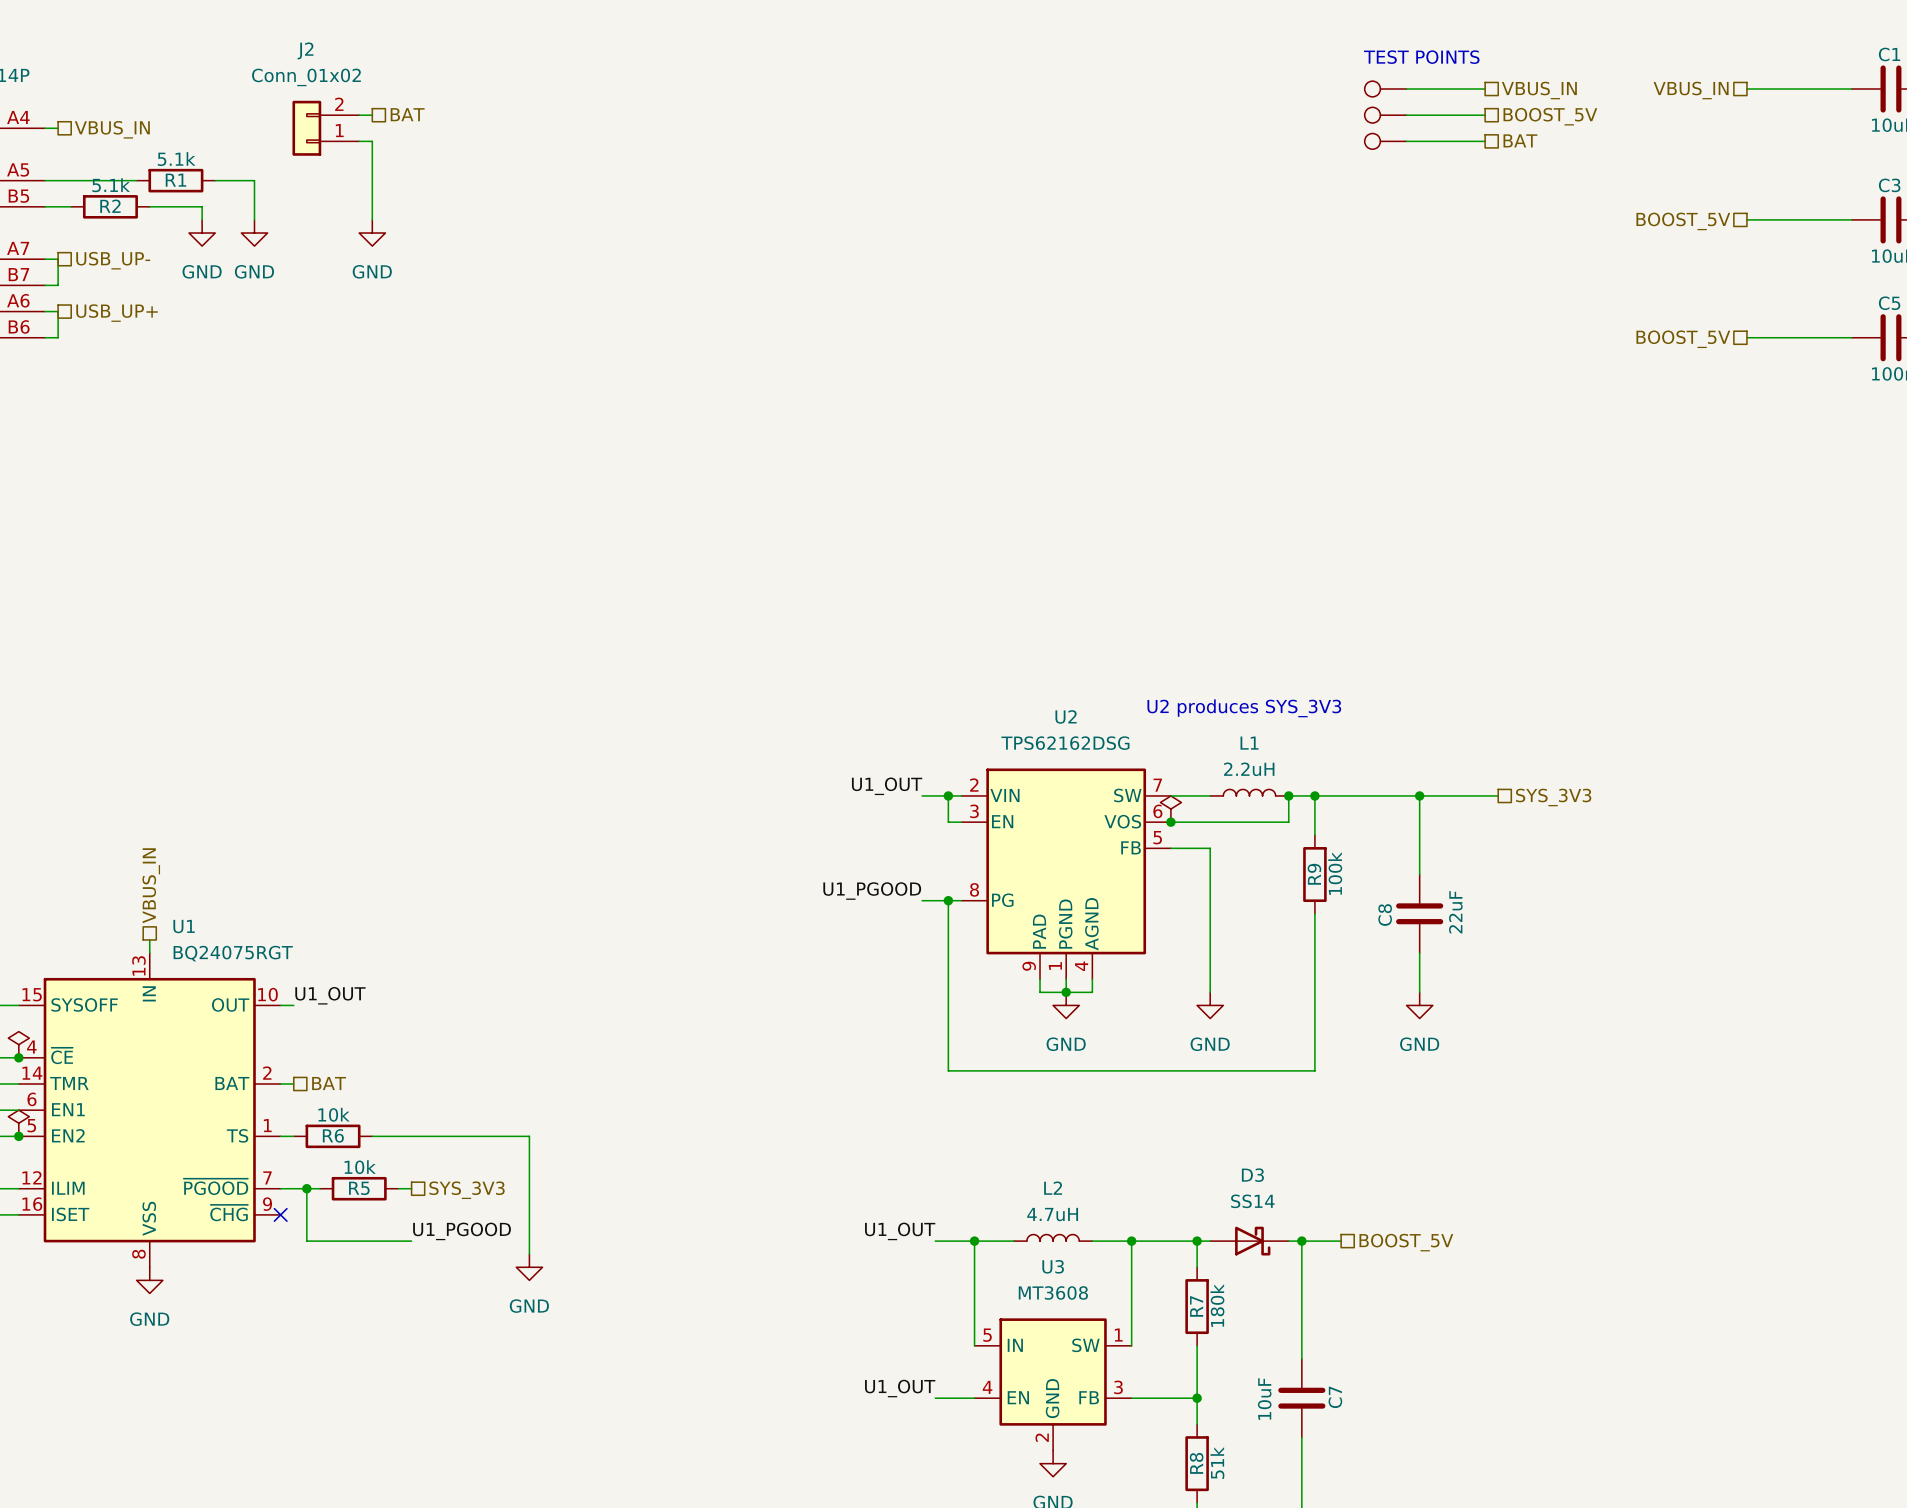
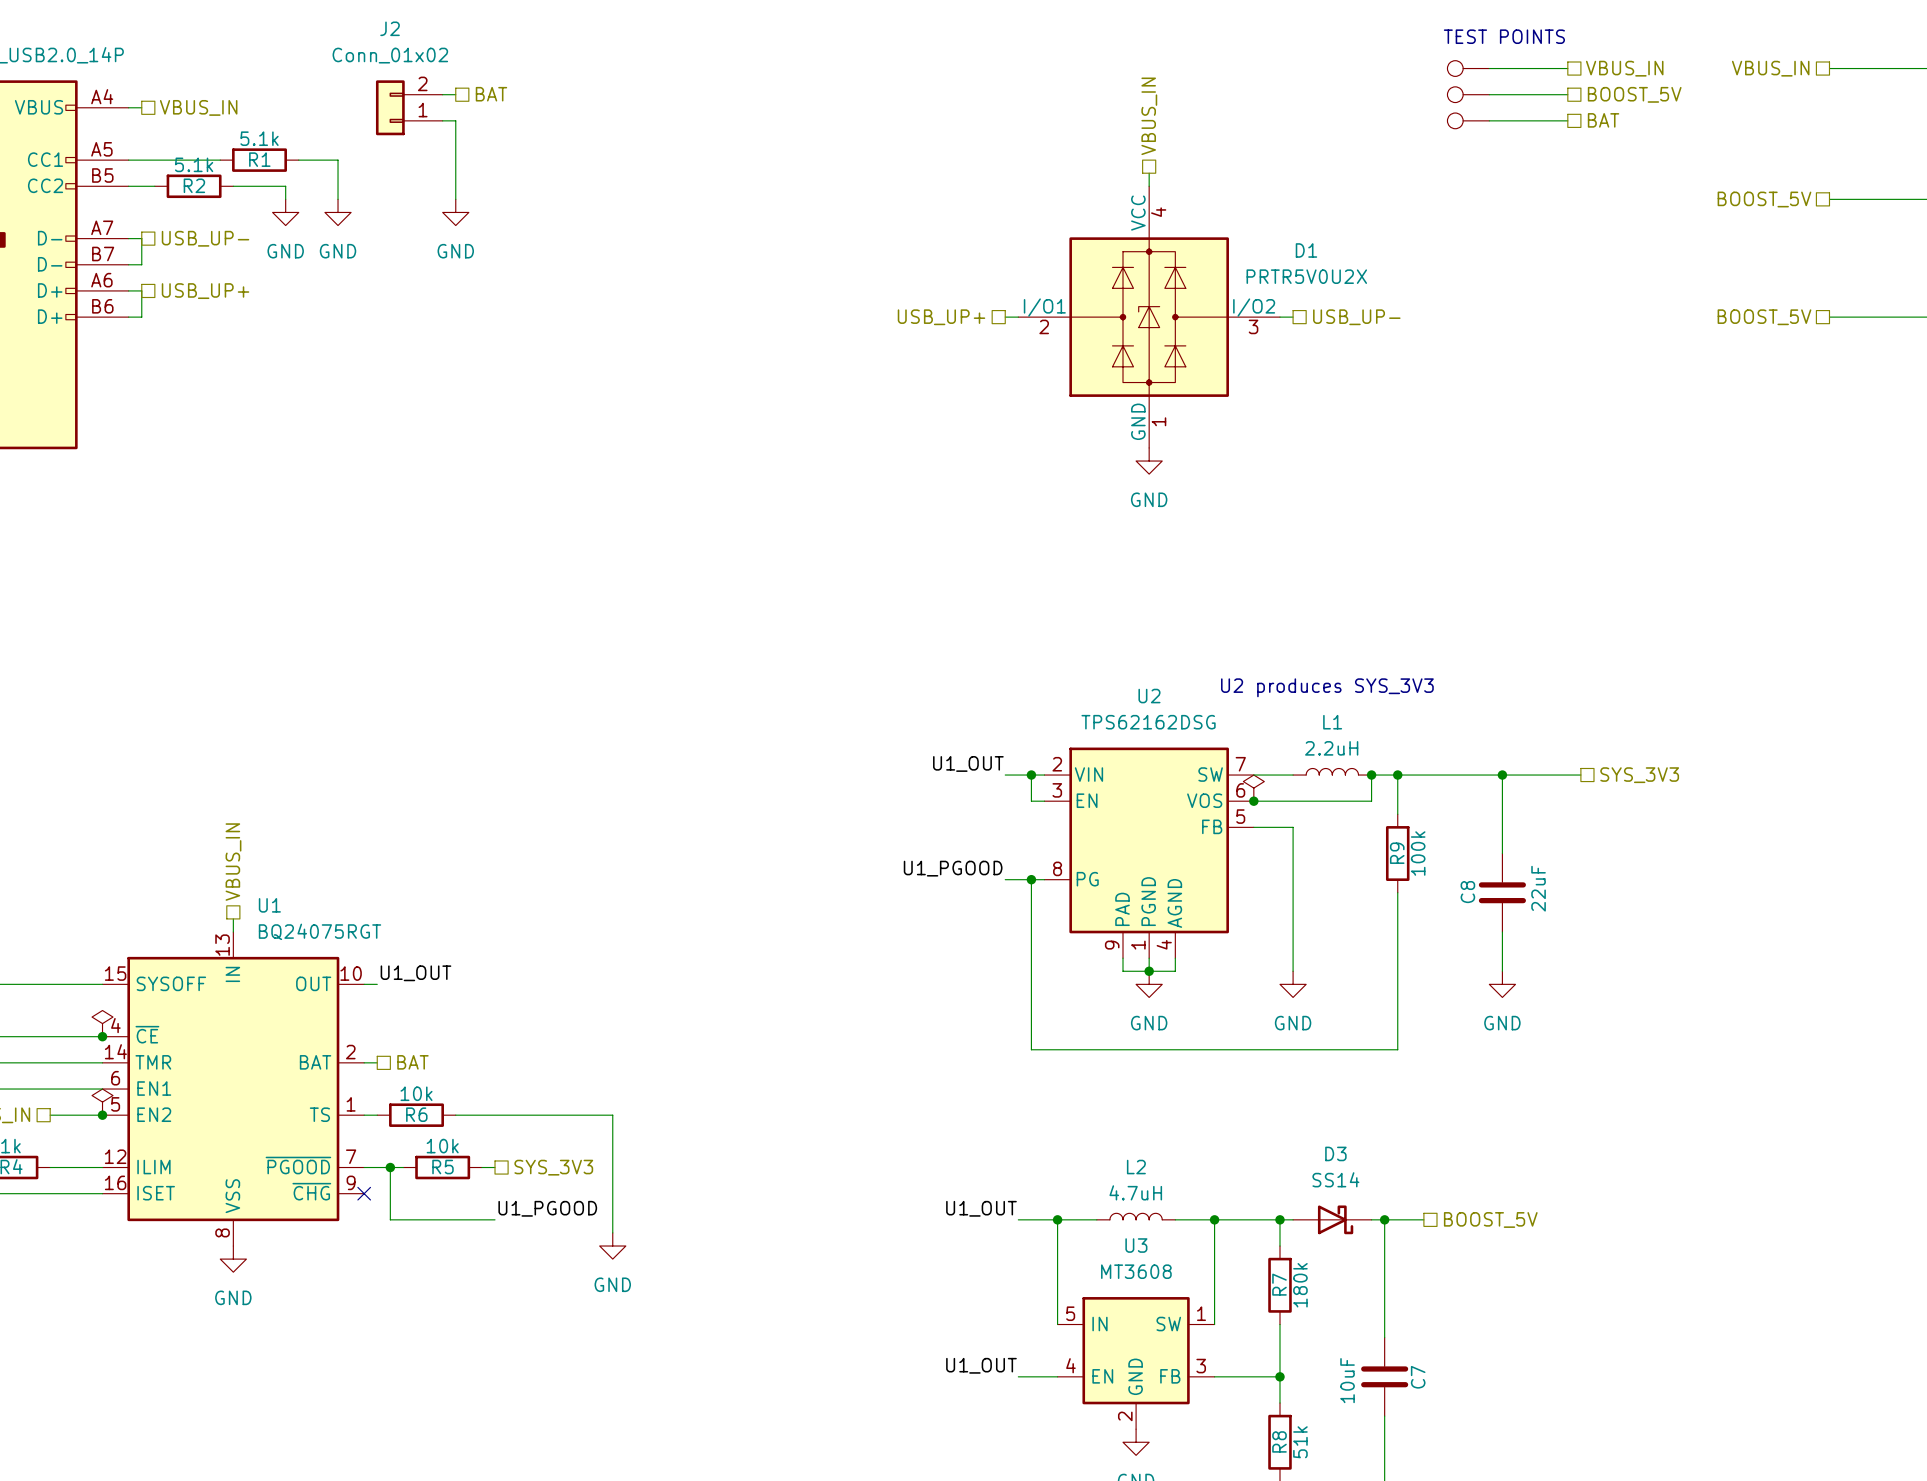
hierarchical label: none -> VBUS_IN (1149, 116)
wire: none -> (1149, 173) (1149, 186)
wire: none -> (1005, 317) (1018, 317)
D1: none -> PRTR5V0U2X (1149, 317)
wire: none -> (1279, 317) (1293, 317)
hierarchical label: none -> USB_UP+ (941, 317)
hierarchical label: none -> USB_UP- (1356, 317)
power symbol: none -> GND (1149, 461)

